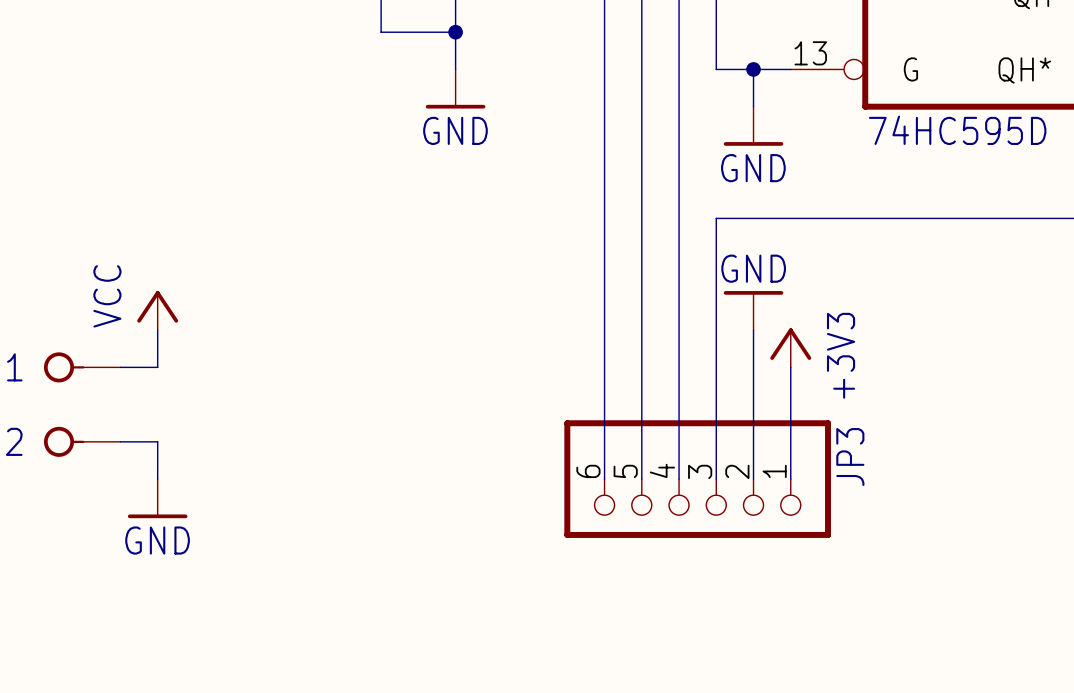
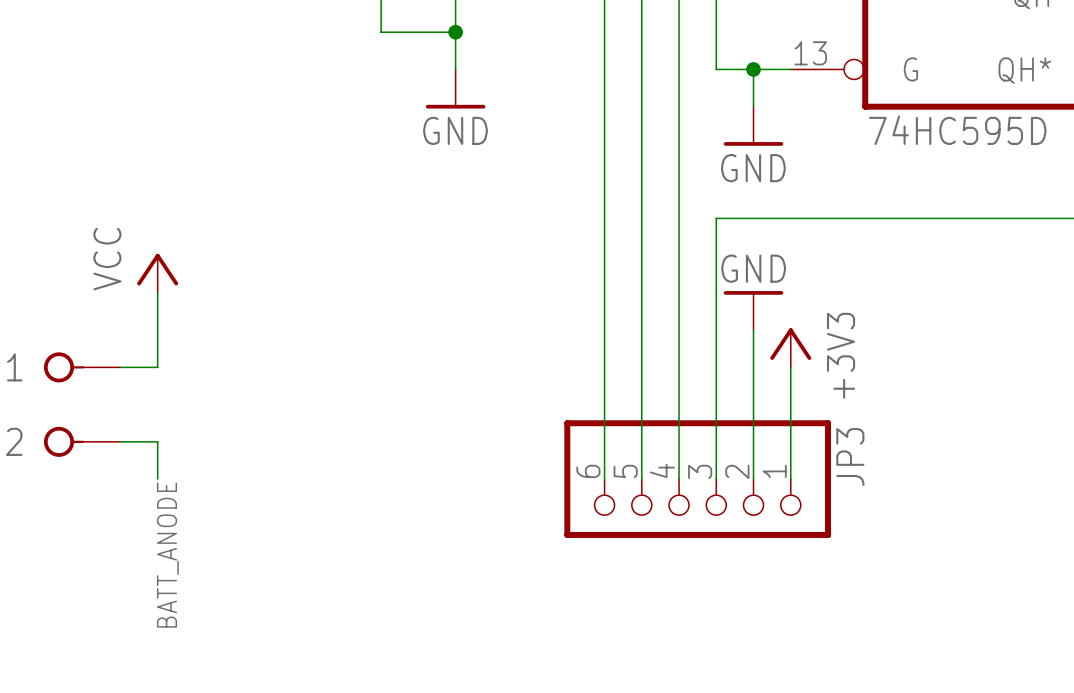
power symbol position: VCC (157, 310) -> VCC (157, 273)
power symbol: GND (157, 498) -> none
label: none -> BATT_ANODE (167, 555)

